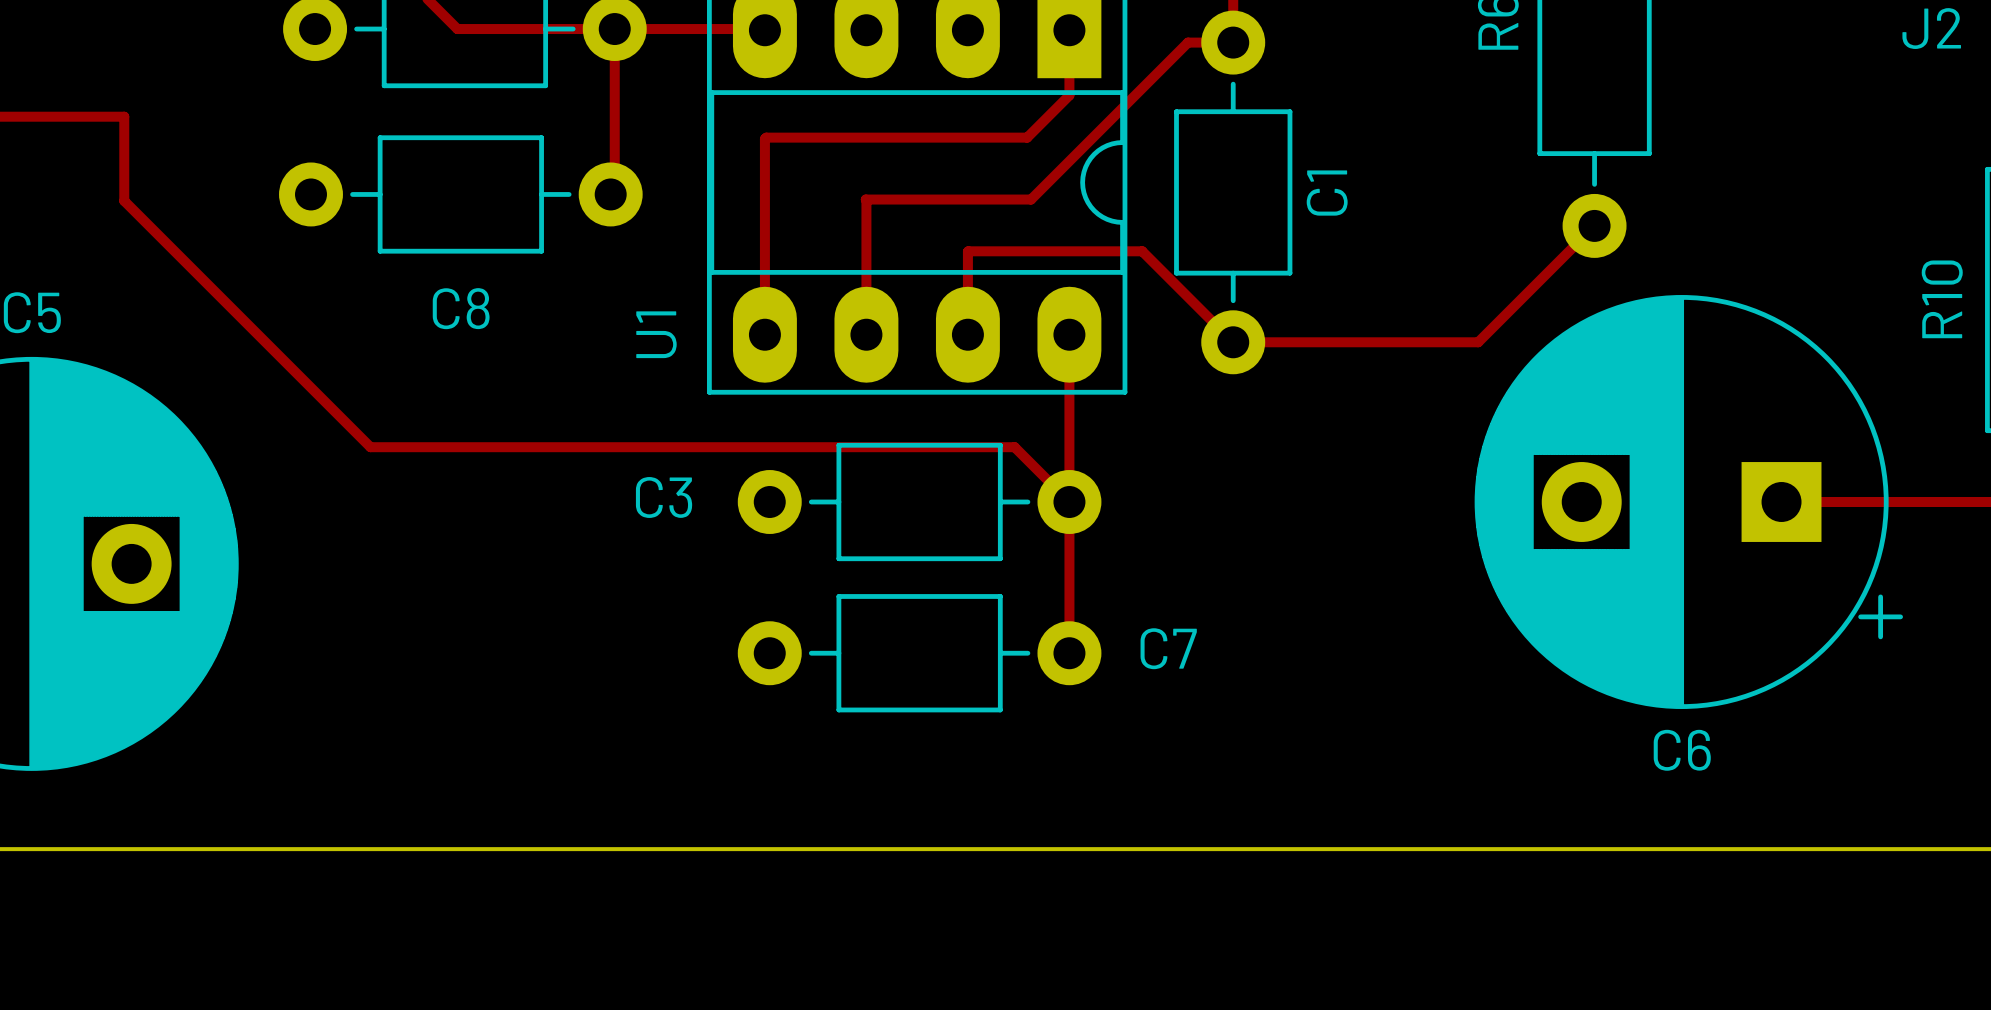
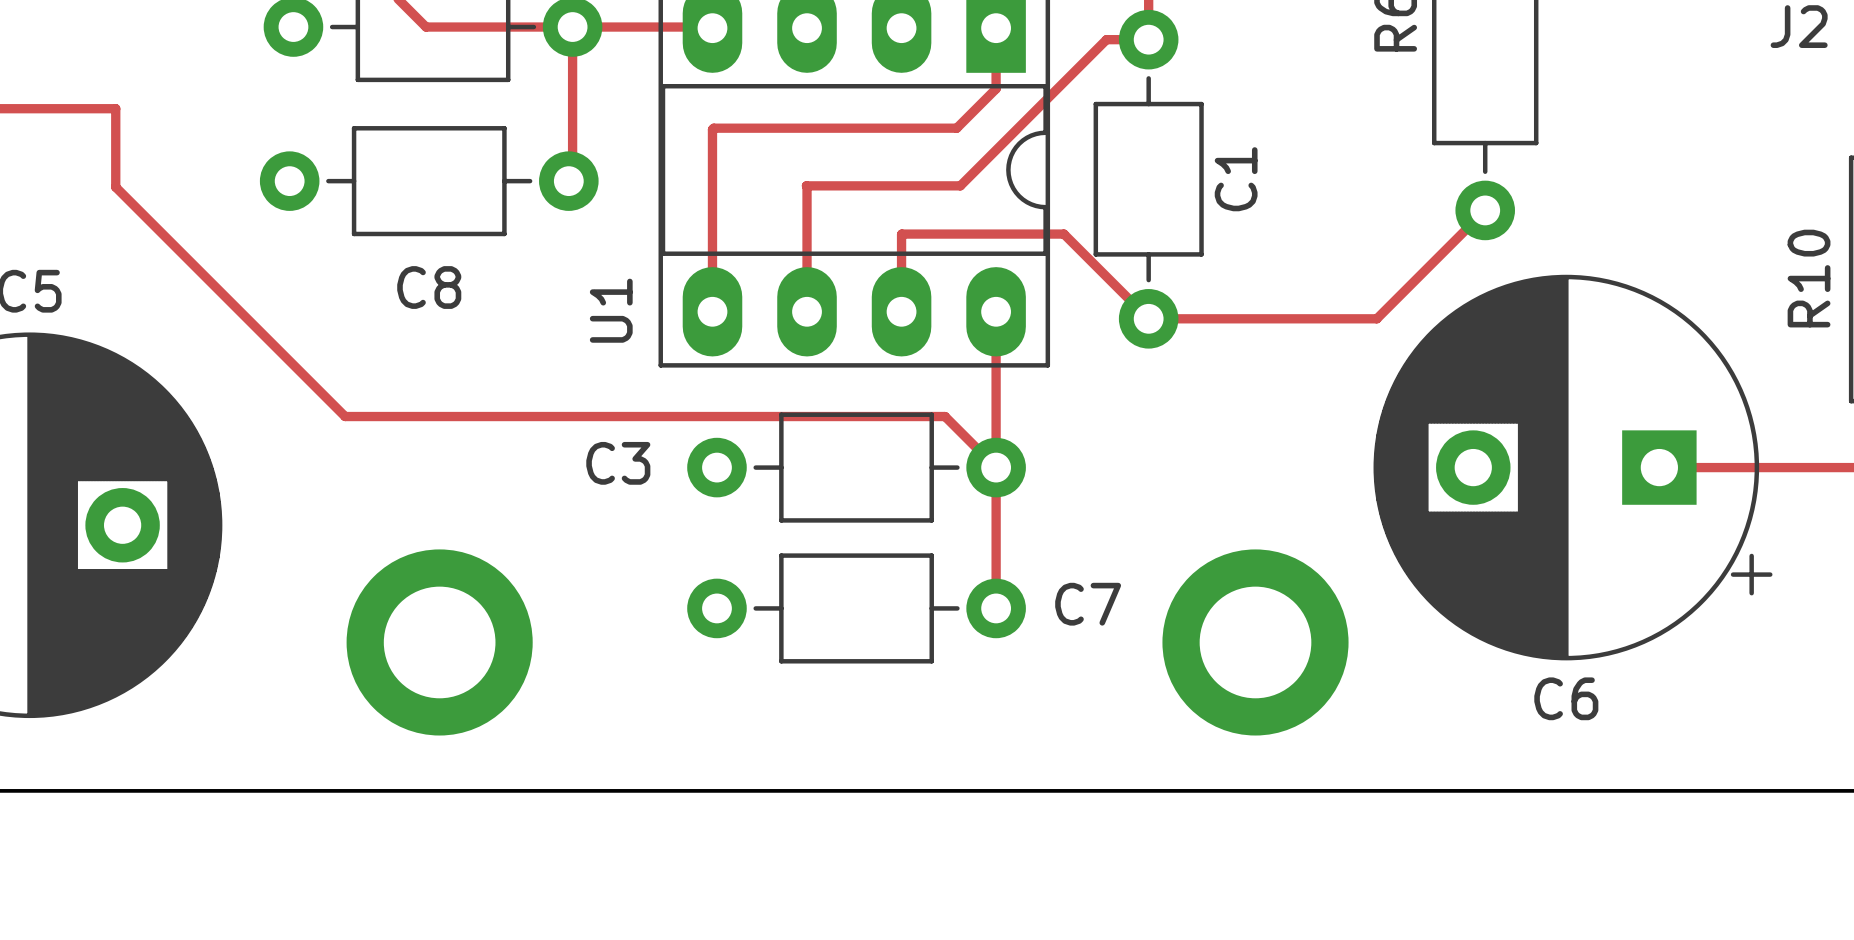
part: none -> (439, 642)
part: none -> (1255, 642)

